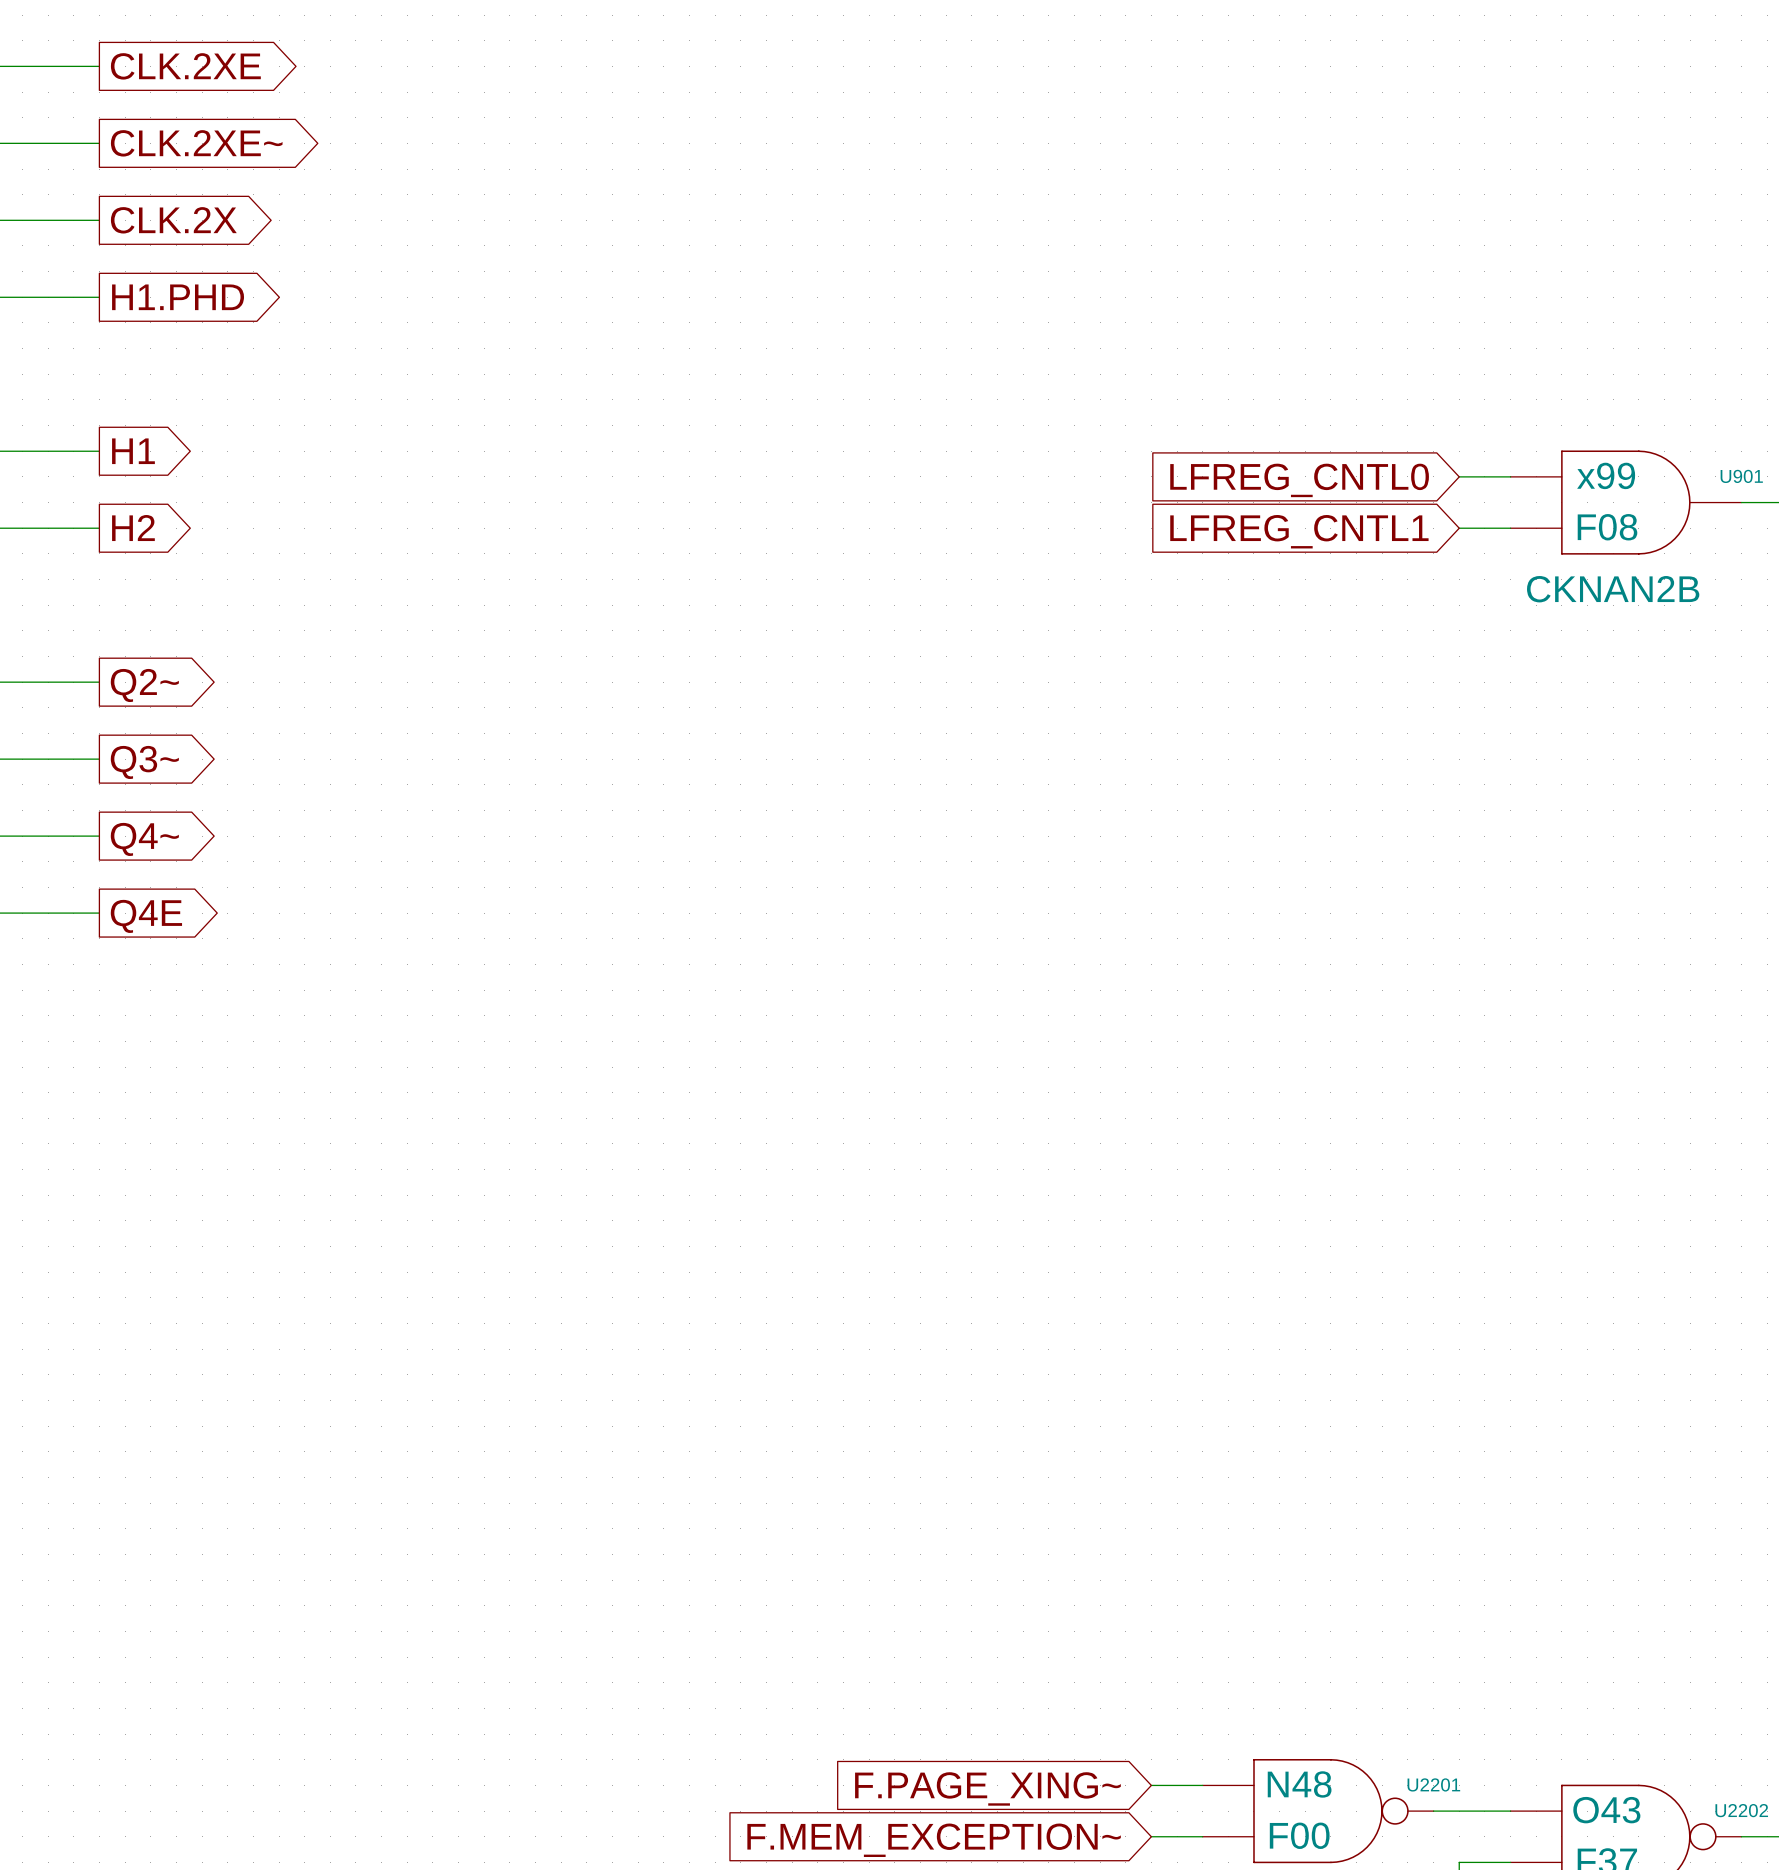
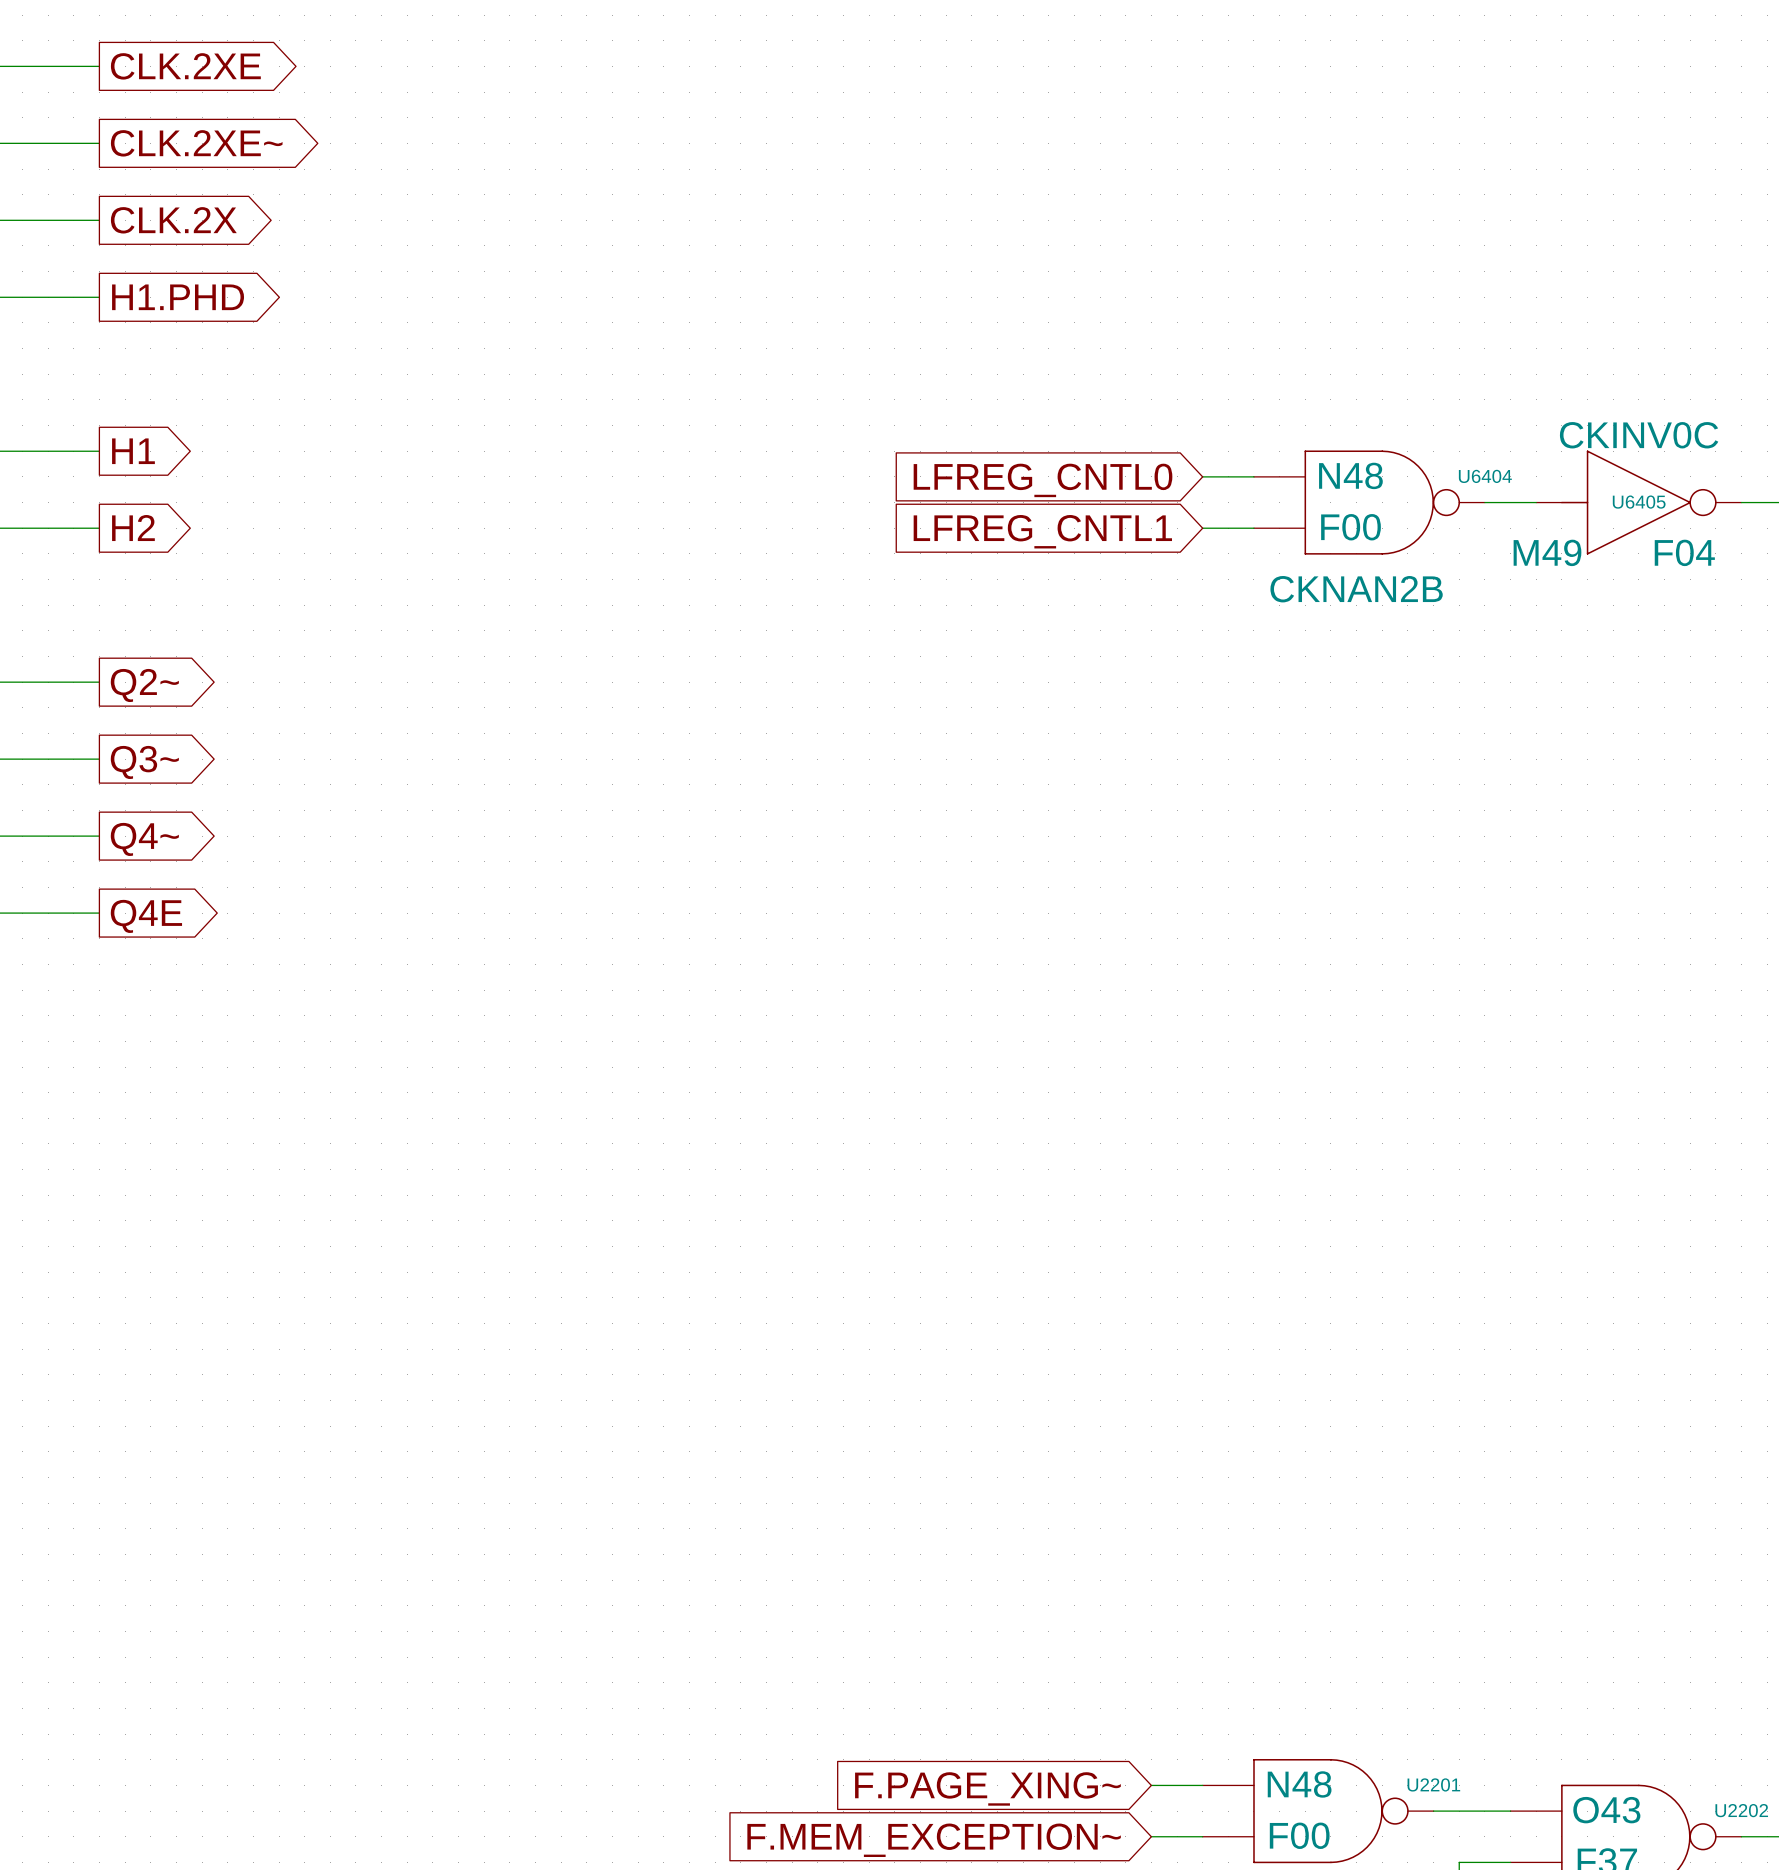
wire: (1459, 476) (1510, 476) -> (1484, 502) (1536, 502)
global label: none -> LFREG_CNTL0 (1043, 480)
global label: LFREG_CNTL0 (1299, 480) -> none
U6404: none -> F00 (1369, 502)
U901: F08 (1626, 502) -> none
U6405: none -> F04 (1638, 502)
wire: (1459, 528) (1510, 528) -> none
global label: none -> LFREG_CNTL1 (1042, 531)
global label: LFREG_CNTL1 (1299, 531) -> none

